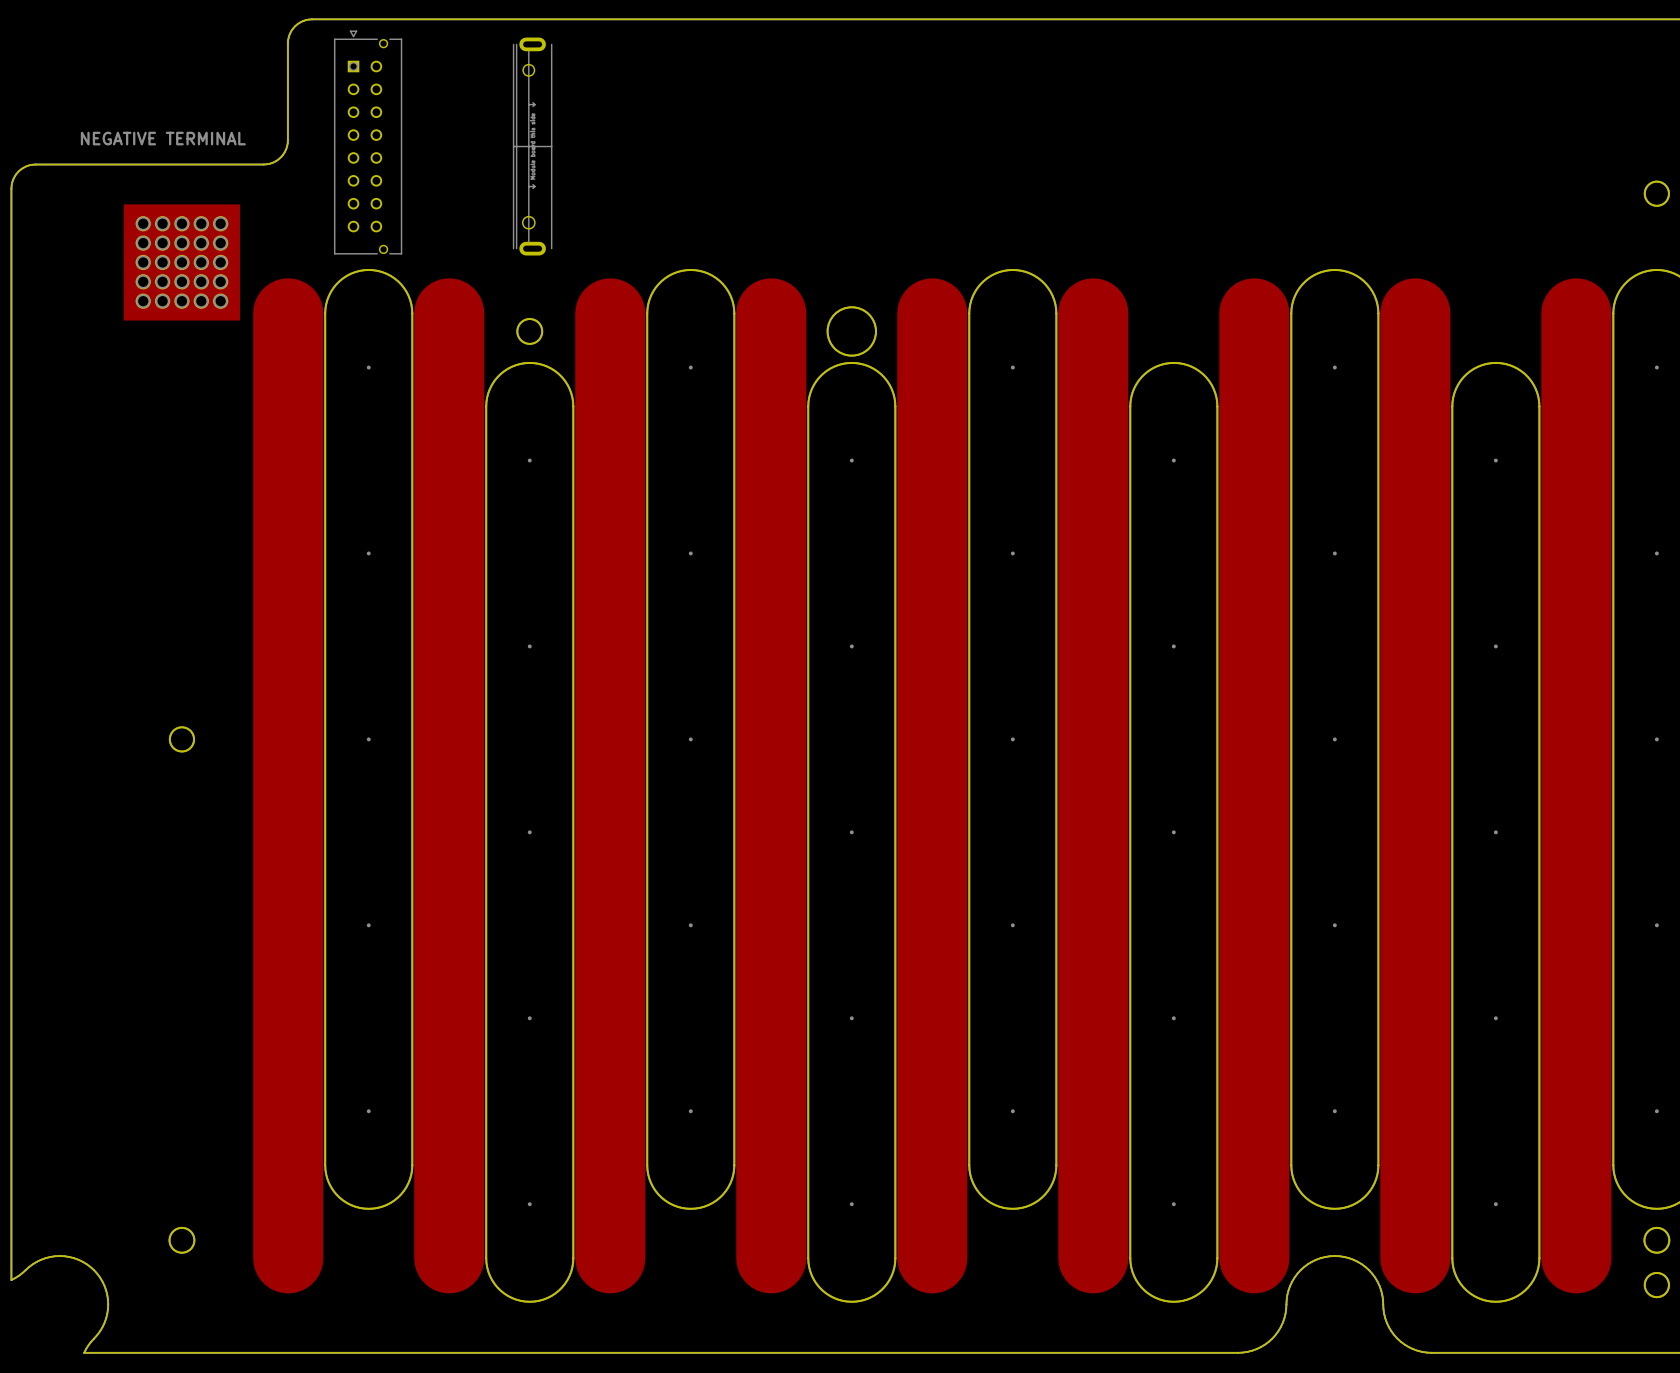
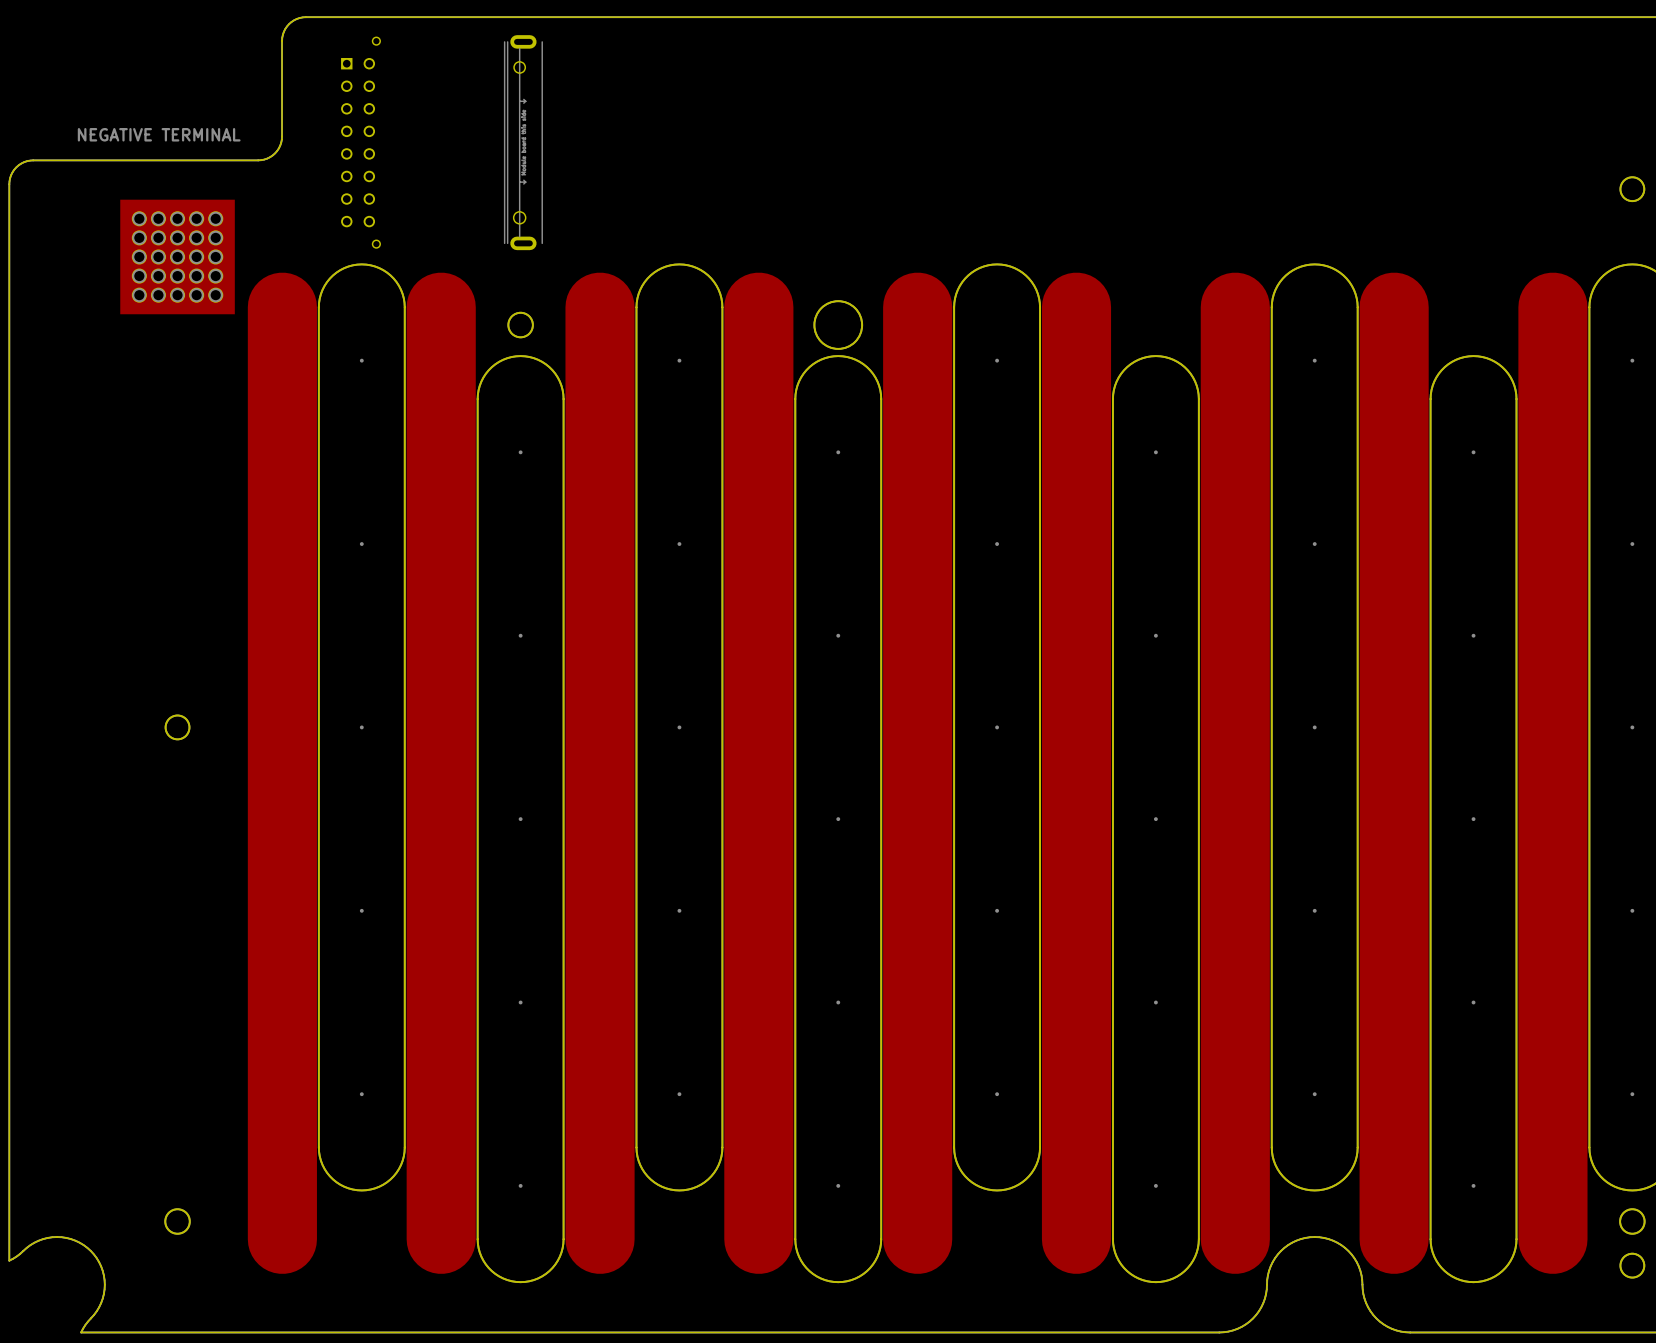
part footprint: [334, 30, 403, 255] -> [341, 37, 381, 248]
part footprint: [513, 37, 553, 256] -> [504, 35, 543, 251]

